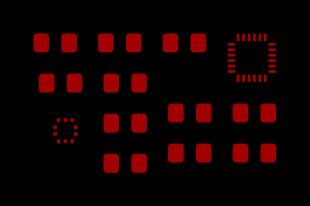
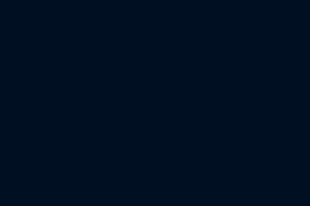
part: (55, 42) -> none
part: (119, 42) -> none
part: (184, 42) -> none
part: (251, 57) -> none
part: (60, 83) -> none
part: (125, 83) -> none
part: (189, 112) -> none
part: (254, 112) -> none
part: (125, 123) -> none
part: (65, 130) -> none
part: (189, 153) -> none
part: (254, 153) -> none
part: (125, 163) -> none

